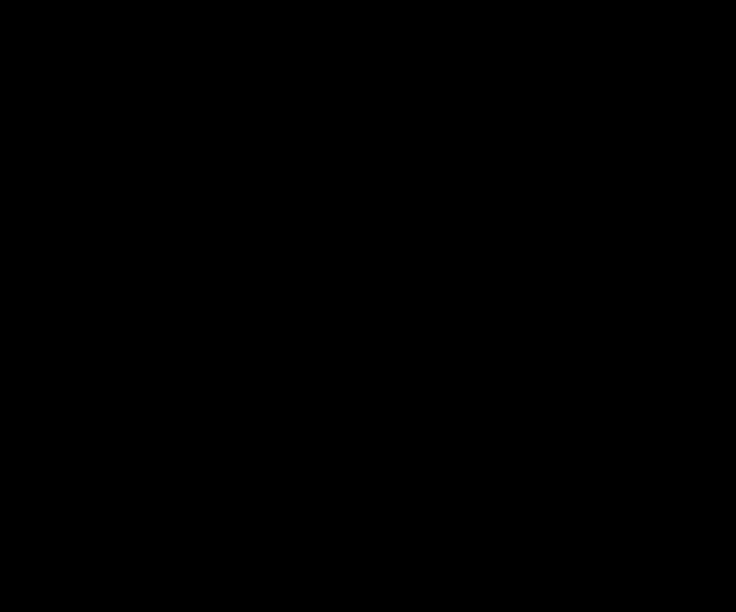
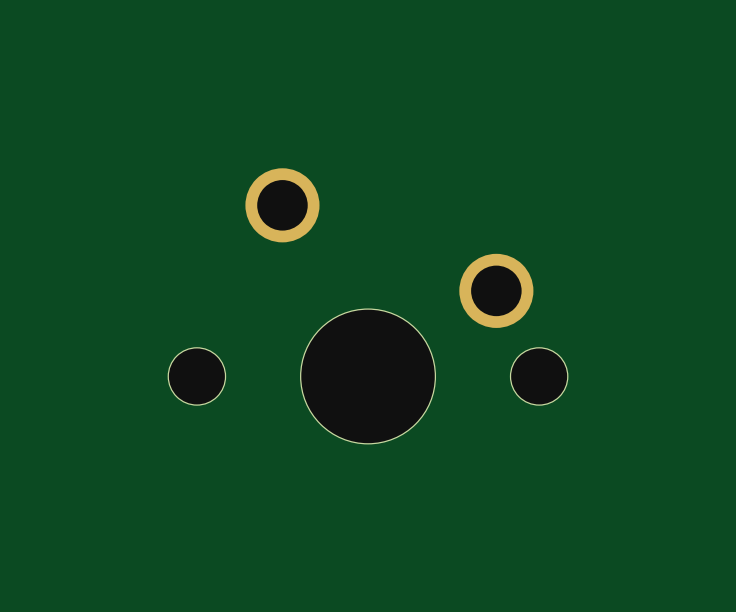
part: none -> (368, 306)

